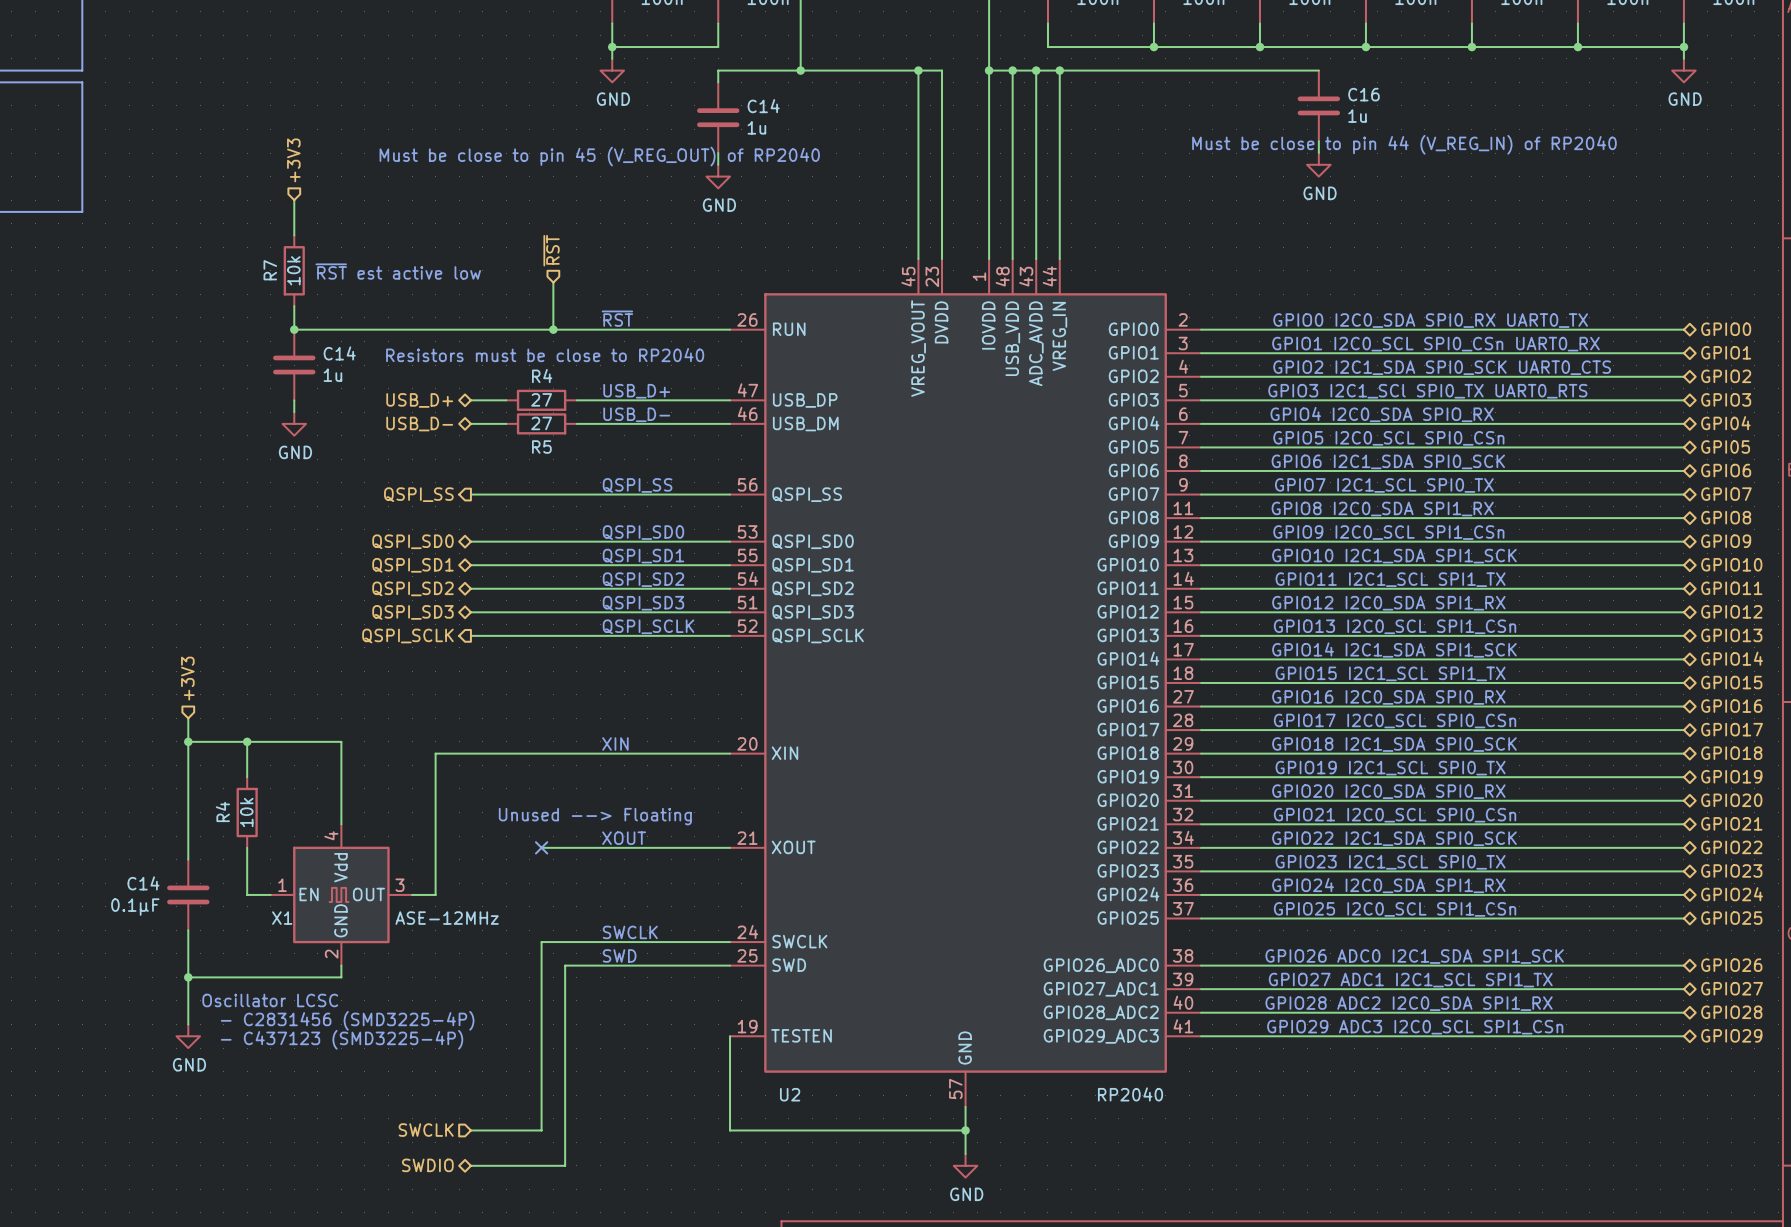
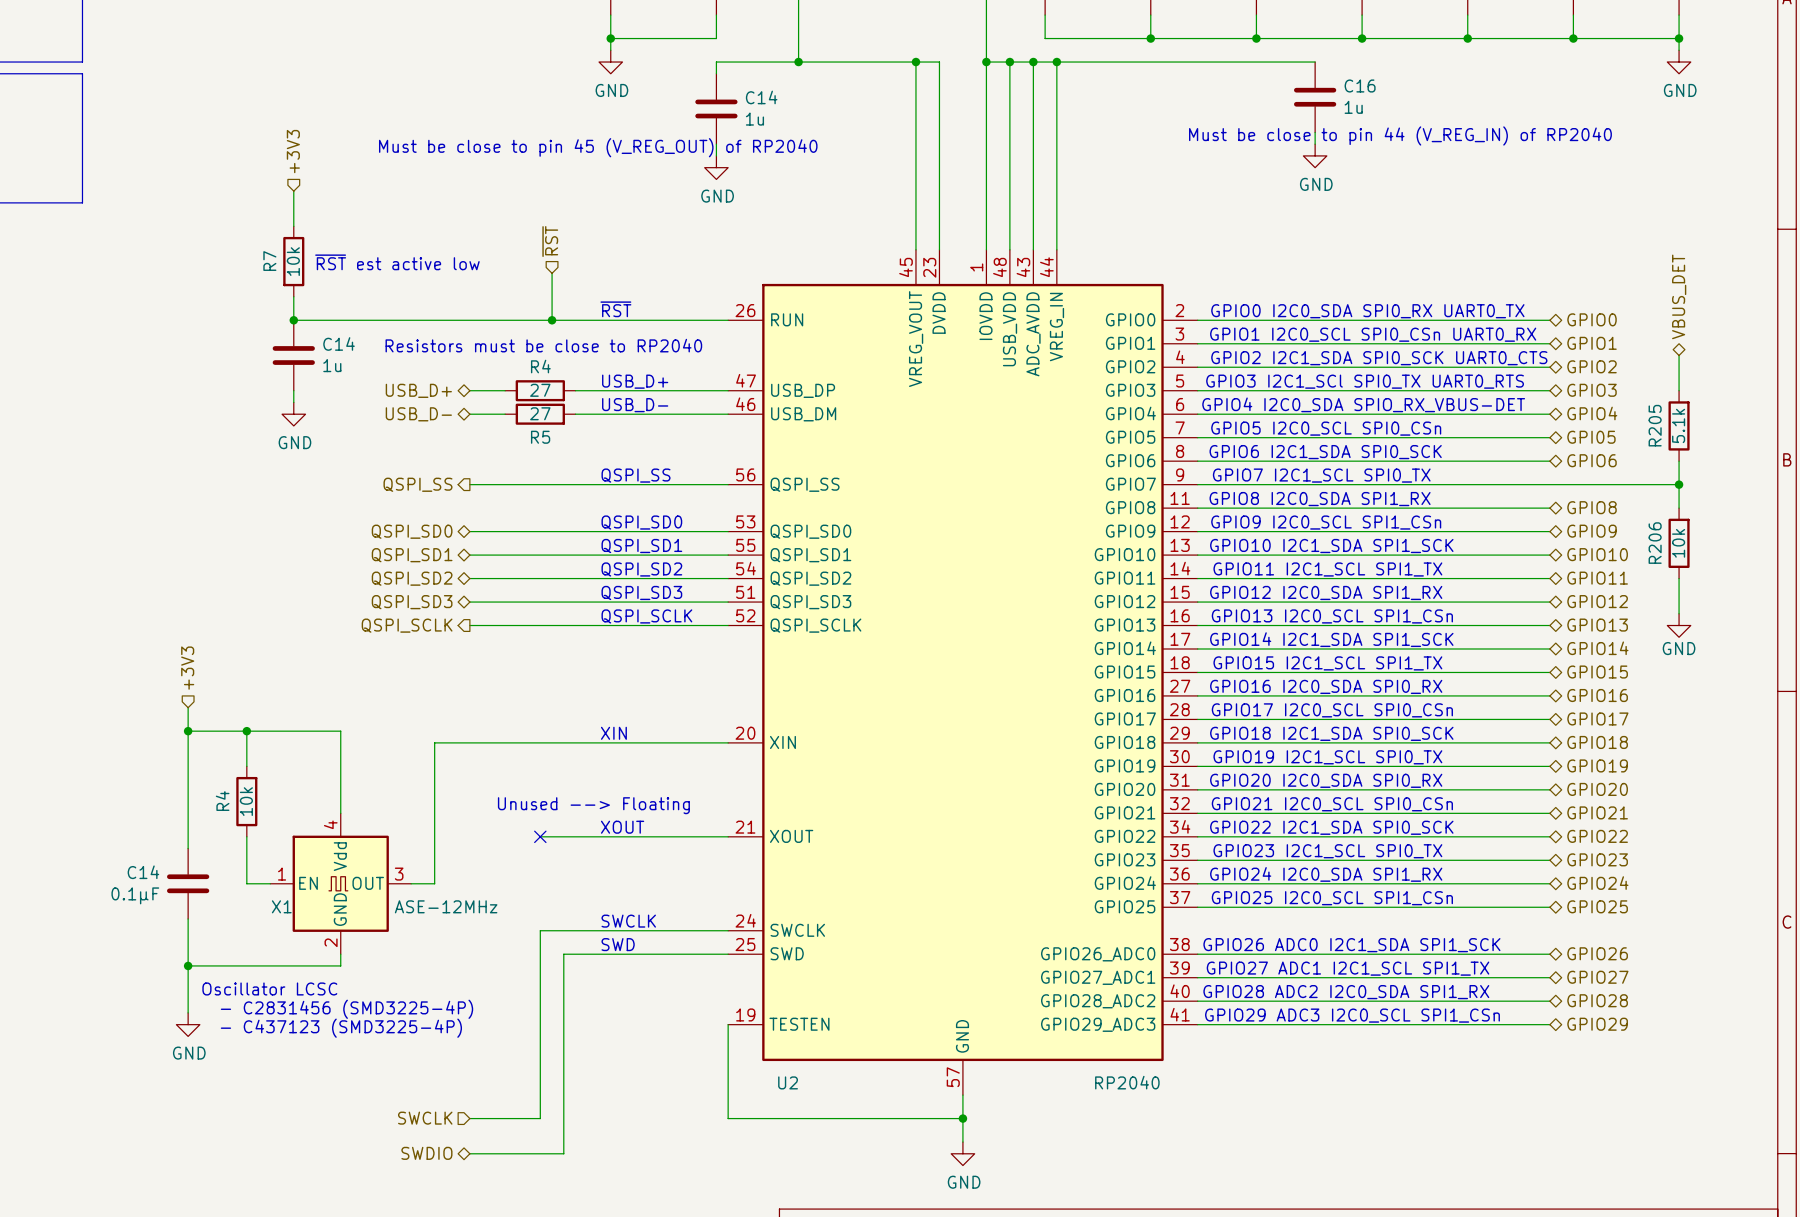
hierarchical label: none -> VBUS_DET (1679, 296)
text position: GPIO0 I2C0_SDA SPI0_RX UART0_TX (1430, 320) -> GPIO0 I2C0_SDA SPI0_RX UART0_TX (1367, 311)
wire: (1554, 329) (1683, 329) -> none
hierarchical label position: GPIO0 (1726, 329) -> GPIO0 (1592, 319)
text position: GPIO1 I2C0_SCL SPI0_CSn UART0_RX (1435, 344) -> GPIO1 I2C0_SCL SPI0_CSn UART0_RX (1373, 334)
hierarchical label position: GPIO1 (1726, 352) -> GPIO1 (1592, 343)
wire: (1554, 353) (1683, 353) -> none
text position: GPIO2 I2C1_SDA SPI0_SCK UART0_CTS (1442, 367) -> GPIO2 I2C1_SDA SPI0_SCK UART0_CTS (1379, 358)
wire: (1554, 376) (1683, 376) -> none
hierarchical label position: GPIO2 (1726, 376) -> GPIO2 (1592, 366)
text position: GPIO3 I2C1_SCl SPI0_TX UART0_RTS (1427, 391) -> GPIO3 I2C1_SCl SPI0_TX UART0_RTS (1365, 381)
hierarchical label position: GPIO3 (1726, 399) -> GPIO3 (1592, 390)
wire: (1554, 400) (1683, 400) -> (1679, 355) (1679, 390)
text: GPIO4 I2C0_SDA SPIO_RX (1382, 414) -> GPIO4 I2C0_SDA SPIO_RX_VBUS-DET (1363, 404)
wire: (1554, 423) (1683, 423) -> none
hierarchical label: none -> GPIO4 (1592, 413)
hierarchical label: GPI04 (1725, 423) -> none
R205: none -> 5.1k (1679, 425)
text position: GPIO5 I2C0_SCL SPI0_CSn (1388, 438) -> GPIO5 I2C0_SCL SPI0_CSn (1326, 428)
wire: (1554, 447) (1683, 447) -> none
hierarchical label position: GPI05 (1725, 447) -> GPI05 (1591, 437)
text position: GPIO6 I2C1_SDA SPI0_SCK (1388, 461) -> GPIO6 I2C1_SDA SPI0_SCK (1325, 452)
wire: (1554, 470) (1683, 470) -> (1679, 508) (1679, 461)
hierarchical label position: GPIO6 (1726, 470) -> GPIO6 (1592, 460)
text position: GPIO7 I2C1_SCL SPI0_TX (1384, 485) -> GPIO7 I2C1_SCL SPI0_TX (1321, 475)
junction: none -> (1679, 484)
hierarchical label: GPIO7 (1726, 494) -> none
text position: GPIO8 I2C0_SDA SPI1_RX (1382, 509) -> GPIO8 I2C0_SDA SPI1_RX (1320, 499)
hierarchical label position: GPIO8 (1726, 517) -> GPIO8 (1592, 507)
wire: (1554, 518) (1683, 518) -> none
text position: GPIO9 I2C0_SCL SPI1_CSn (1388, 532) -> GPIO9 I2C0_SCL SPI1_CSn (1326, 522)
wire: (1554, 541) (1683, 541) -> none
hierarchical label position: GPIO9 (1726, 541) -> GPIO9 (1592, 531)
R206: none -> 10k (1679, 543)
text position: GPIO10 I2C1_SDA SPI1_SCK (1394, 556) -> GPIO10 I2C1_SDA SPI1_SCK (1331, 546)
hierarchical label position: GPIO10 (1731, 564) -> GPIO10 (1597, 554)
wire: (1554, 565) (1683, 565) -> none
text position: GPIO11 I2C1_SCL SPI1_TX (1390, 579) -> GPIO11 I2C1_SCL SPI1_TX (1327, 569)
wire: (1554, 588) (1683, 588) -> (1679, 613) (1679, 578)
hierarchical label position: GPIO11 (1731, 588) -> GPIO11 (1597, 578)
text position: GPIO12 I2C0_SDA SPI1_RX (1388, 603) -> GPIO12 I2C0_SDA SPI1_RX (1326, 592)
hierarchical label position: GPIO12 (1731, 611) -> GPIO12 (1597, 601)
wire: (1554, 612) (1683, 612) -> none
text position: GPIO13 I2C0_SCL SPI1_CSn (1395, 626) -> GPIO13 I2C0_SCL SPI1_CSn (1332, 616)
wire: (1554, 635) (1683, 635) -> none
power symbol: none -> GND (1679, 625)
hierarchical label position: GPIO13 (1731, 635) -> GPIO13 (1597, 625)
text position: GPIO14 I2C1_SDA SPI1_SCK (1394, 650) -> GPIO14 I2C1_SDA SPI1_SCK (1331, 639)
hierarchical label position: GPIO14 (1732, 658) -> GPIO14 (1597, 648)
wire: (1554, 659) (1683, 659) -> none
text position: GPIO15 I2C1_SCL SPI1_TX (1390, 673) -> GPIO15 I2C1_SCL SPI1_TX (1327, 663)
wire: (1554, 682) (1683, 682) -> none
hierarchical label position: GPIO15 (1731, 682) -> GPIO15 (1597, 672)
text position: GPIO16 I2C0_SDA SPI0_RX (1388, 697) -> GPIO16 I2C0_SDA SPI0_RX (1326, 686)
wire: (1554, 706) (1683, 706) -> none
hierarchical label position: GPIO16 (1731, 706) -> GPIO16 (1597, 695)
text position: GPIO17 I2C0_SCL SPI0_CSn (1395, 720) -> GPIO17 I2C0_SCL SPI0_CSn (1332, 710)
hierarchical label position: GPIO17 (1732, 729) -> GPIO17 (1597, 718)
wire: (1554, 730) (1683, 730) -> none
text position: GPIO18 I2C1_SDA SPI0_SCK (1394, 744) -> GPIO18 I2C1_SDA SPI0_SCK (1331, 733)
wire: (1554, 753) (1683, 753) -> none
hierarchical label position: GPIO18 (1731, 753) -> GPIO18 (1597, 742)
text position: GPIO19 I2C1_SCL SPI0_TX (1390, 768) -> GPIO19 I2C1_SCL SPI0_TX (1327, 757)
hierarchical label position: GPIO19 (1731, 776) -> GPIO19 (1597, 765)
wire: (1554, 777) (1683, 777) -> none
text position: GPIO20 I2C0_SDA SPI0_RX (1388, 791) -> GPIO20 I2C0_SDA SPI0_RX (1326, 780)
wire: (1554, 800) (1683, 800) -> none
hierarchical label position: GPIO20 (1731, 800) -> GPIO20 (1597, 789)
text position: GPIO21 I2C0_SCL SPI0_CSn (1395, 815) -> GPIO21 I2C0_SCL SPI0_CSn (1332, 804)
hierarchical label position: GPIO21 (1731, 823) -> GPIO21 (1597, 812)
wire: (1554, 824) (1683, 824) -> none
text position: GPIO22 I2C1_SDA SPI0_SCK (1394, 838) -> GPIO22 I2C1_SDA SPI0_SCK (1331, 827)
wire: (1554, 847) (1683, 847) -> none
hierarchical label position: GPIO22 (1731, 847) -> GPIO22 (1597, 836)
text position: GPIO23 I2C1_SCL SPI0_TX (1390, 862) -> GPIO23 I2C1_SCL SPI0_TX (1327, 851)
hierarchical label position: GPIO23 (1731, 870) -> GPIO23 (1597, 859)
wire: (1554, 871) (1683, 871) -> none
text position: GPIO24 I2C0_SDA SPI1_RX (1388, 885) -> GPIO24 I2C0_SDA SPI1_RX (1326, 874)
wire: (1554, 894) (1683, 894) -> none
hierarchical label position: GPIO24 (1732, 894) -> GPIO24 (1597, 883)
text position: GPIO25 I2C0_SCL SPI1_CSn (1395, 909) -> GPIO25 I2C0_SCL SPI1_CSn (1332, 898)
wire: (1554, 918) (1683, 918) -> none
hierarchical label position: GPIO25 (1731, 918) -> GPIO25 (1597, 906)
text position: GPIO26 ADC0 I2C1_SDA SPI1_SCK (1414, 956) -> GPIO26 ADC0 I2C1_SDA SPI1_SCK (1351, 945)
wire: (1554, 965) (1683, 965) -> none
hierarchical label position: GPIO26 (1731, 965) -> GPIO26 (1597, 953)
text position: GPIO27 ADC1 I2C1_SCL SPI1_TX (1410, 980) -> GPIO27 ADC1 I2C1_SCL SPI1_TX (1348, 968)
hierarchical label position: GPIO27 (1732, 988) -> GPIO27 (1597, 977)
wire: (1554, 989) (1683, 989) -> none
text position: GPIO28 ADC2 I2C0_SDA SPI1_RX (1409, 1003) -> GPIO28 ADC2 I2C0_SDA SPI1_RX (1346, 992)
wire: (1554, 1012) (1683, 1012) -> none
hierarchical label position: GPIO28 (1731, 1012) -> GPIO28 (1597, 1000)
text position: GPIO29 ADC3 I2C0_SCL SPI1_CSn (1415, 1027) -> GPIO29 ADC3 I2C0_SCL SPI1_CSn (1352, 1015)
hierarchical label position: GPIO29 (1731, 1035) -> GPIO29 (1597, 1024)
wire: (1554, 1036) (1683, 1036) -> none

